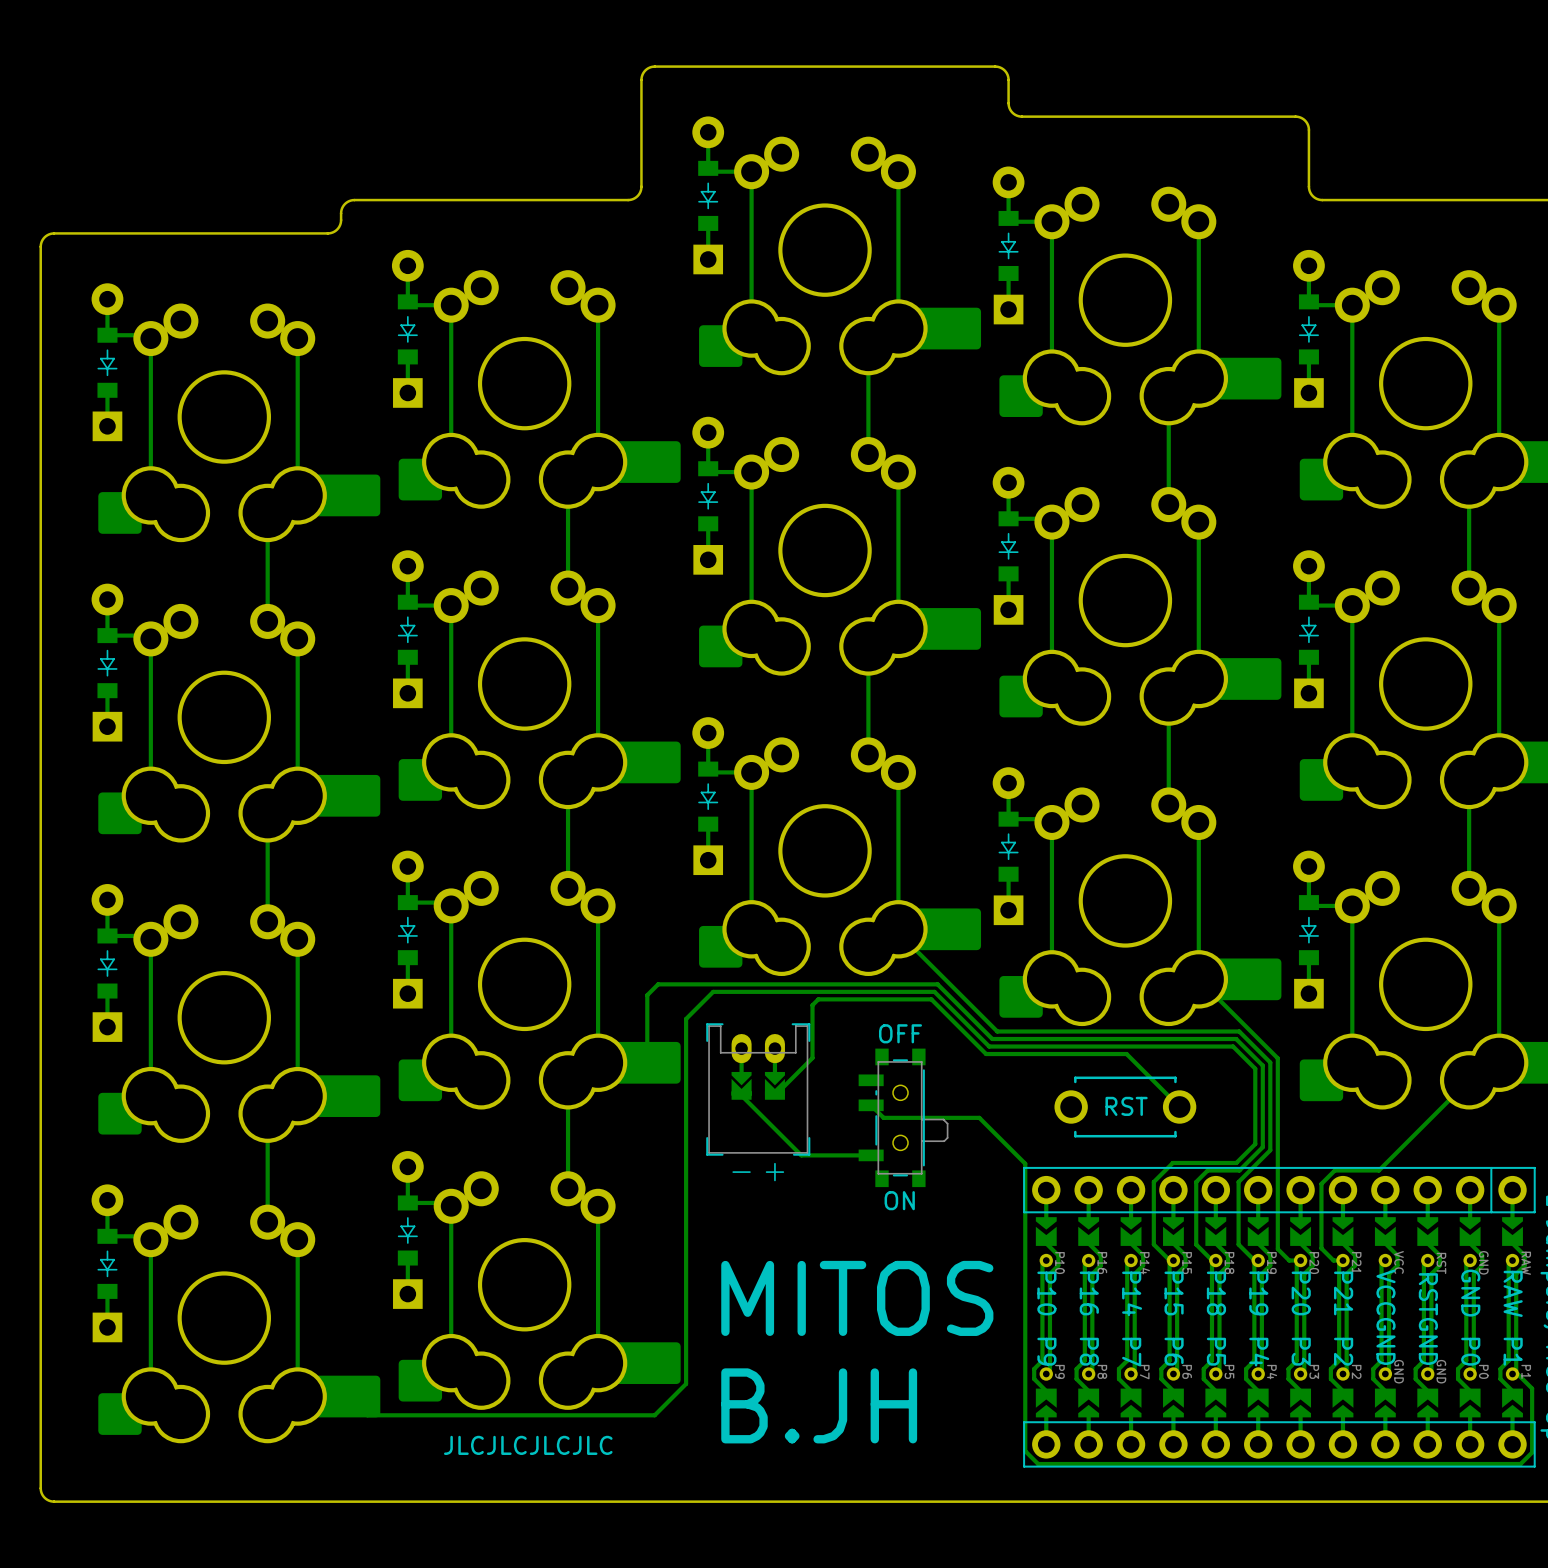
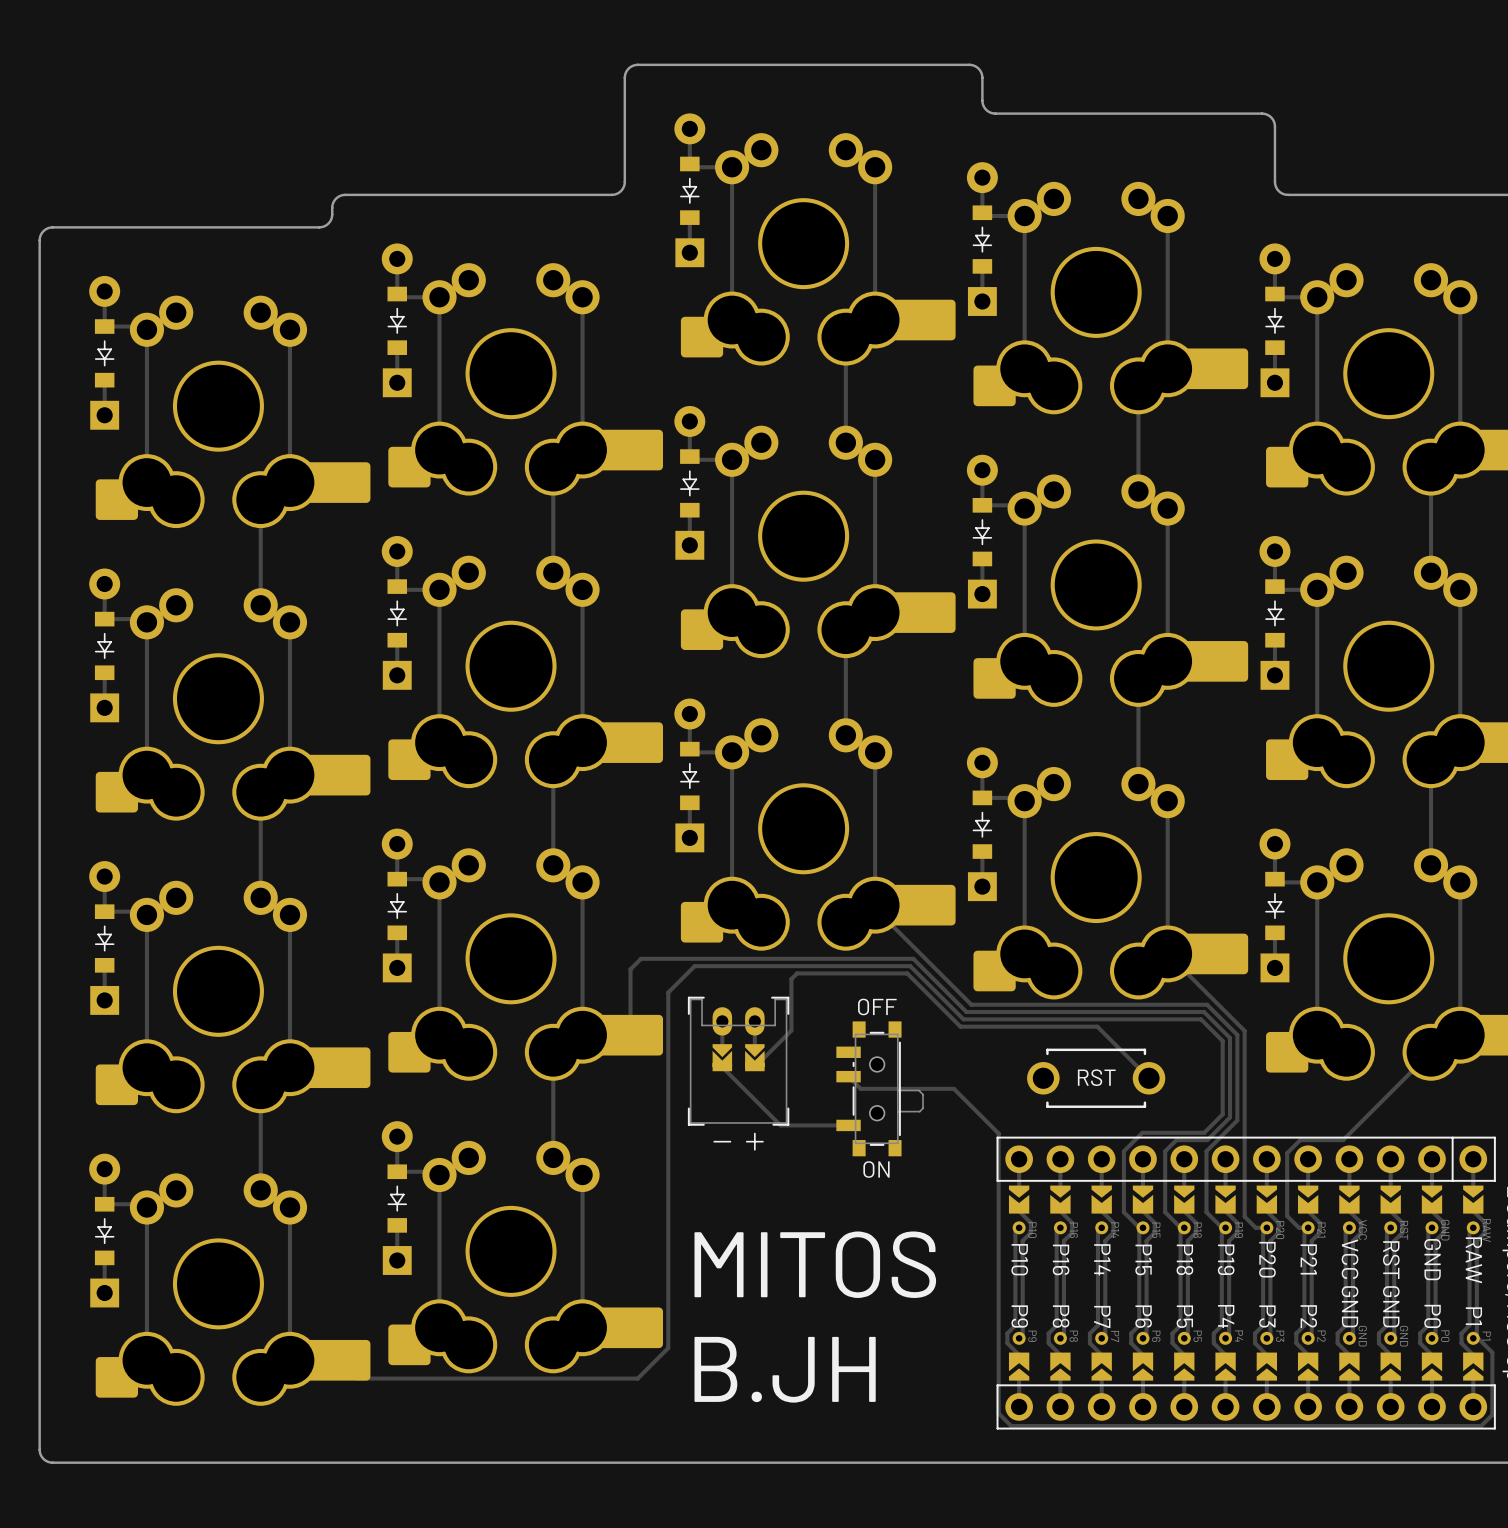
text: JLCJLCJLCJLC (528, 1445) -> none

